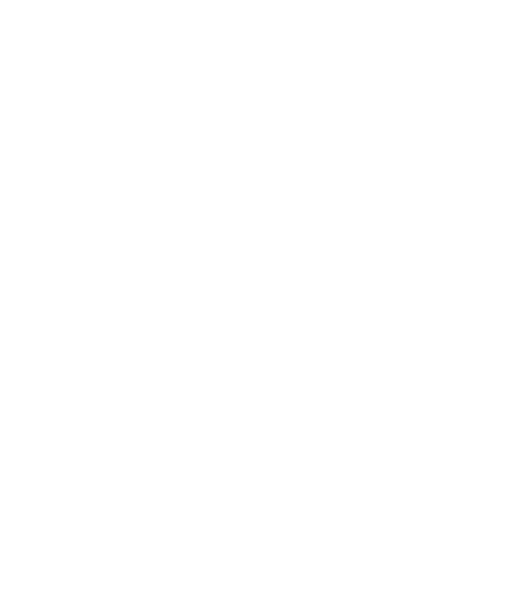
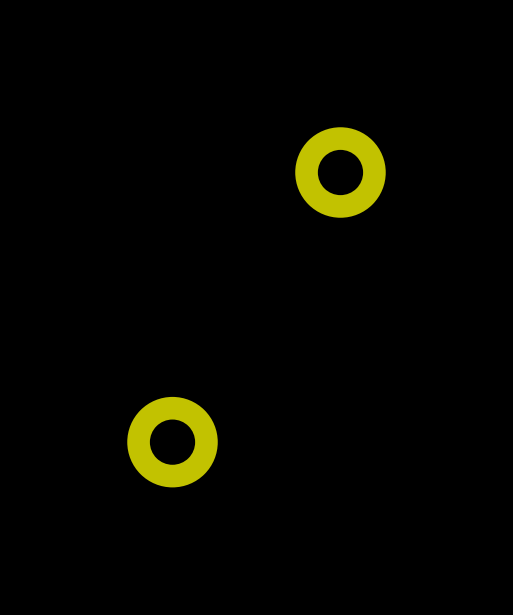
part: none -> (340, 172)
part: none -> (172, 442)

